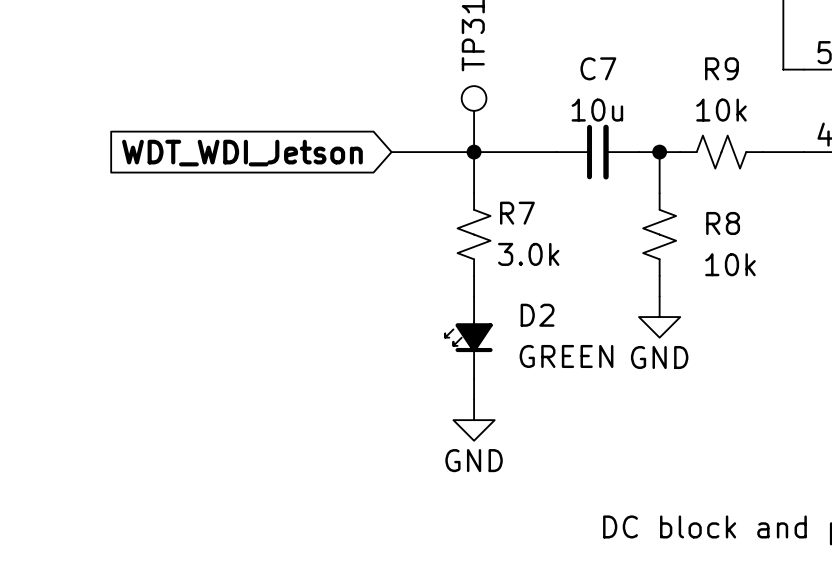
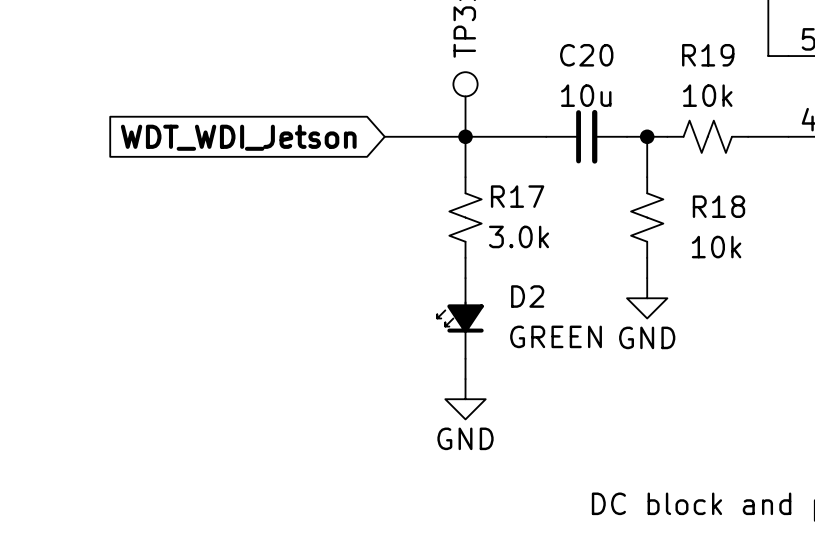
C7 name: C7 (598, 68) -> C20 (586, 55)
R9 name: R9 (721, 68) -> R19 (708, 55)
R7 name: R7 (517, 213) -> R17 (517, 196)
R8 name: R8 (723, 223) -> R18 (718, 206)

